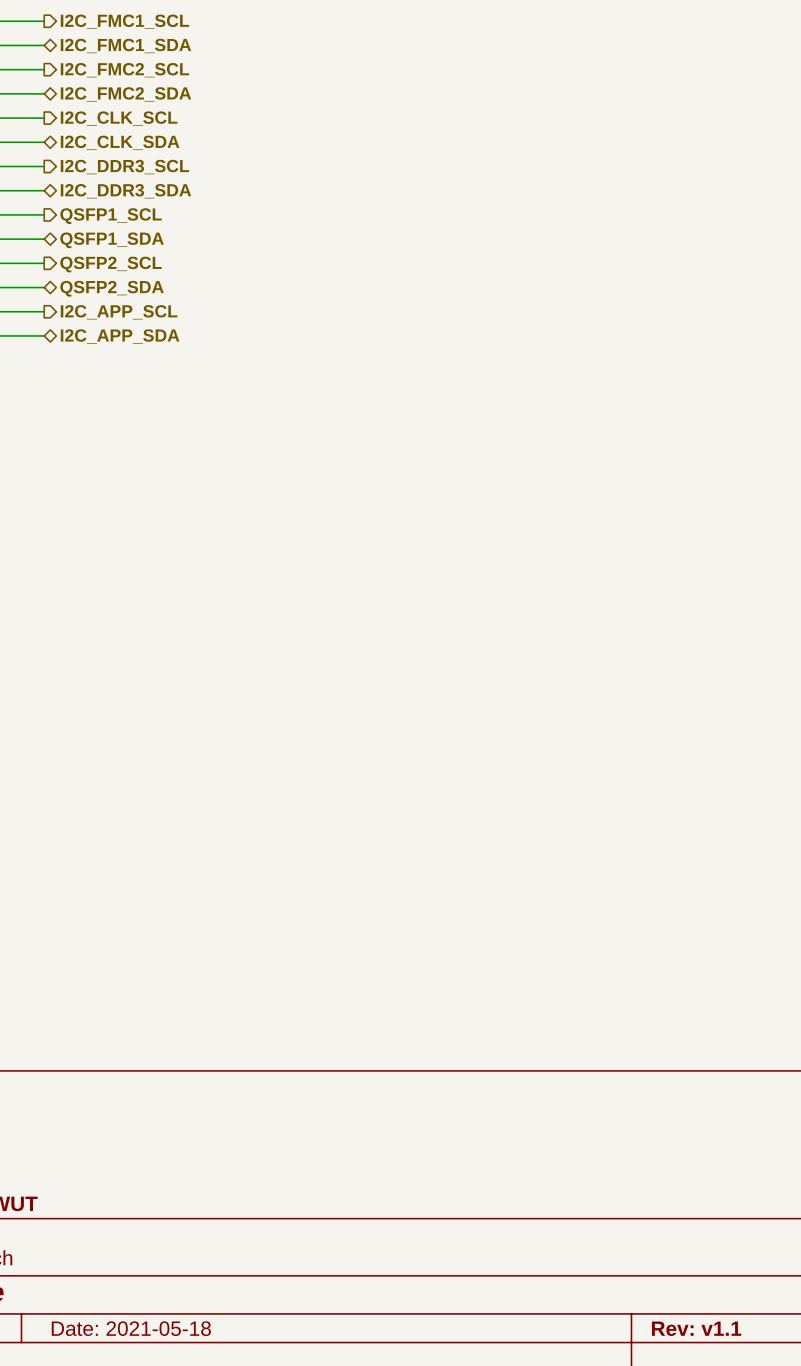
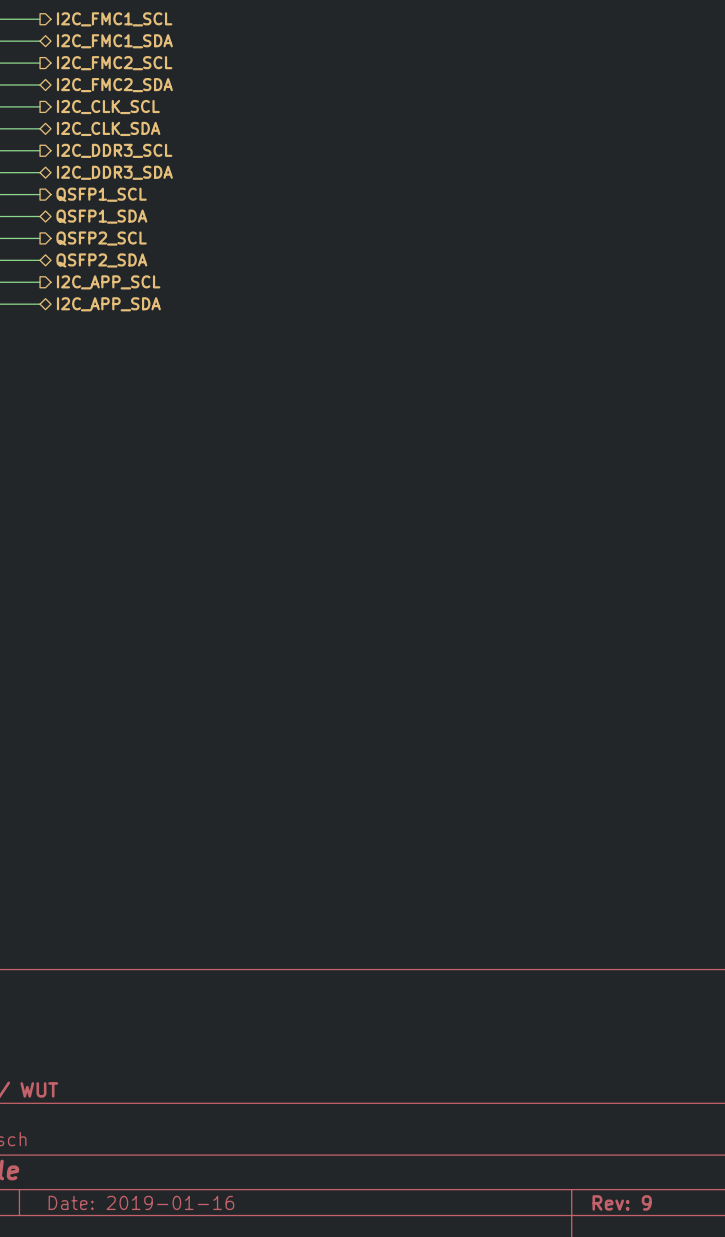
title block: Date: 2021-05-18 (131, 1328) -> Date: 2019-01-16 (141, 1202)
title block: Rev: v1.1 (696, 1328) -> Rev: 9 (622, 1202)

